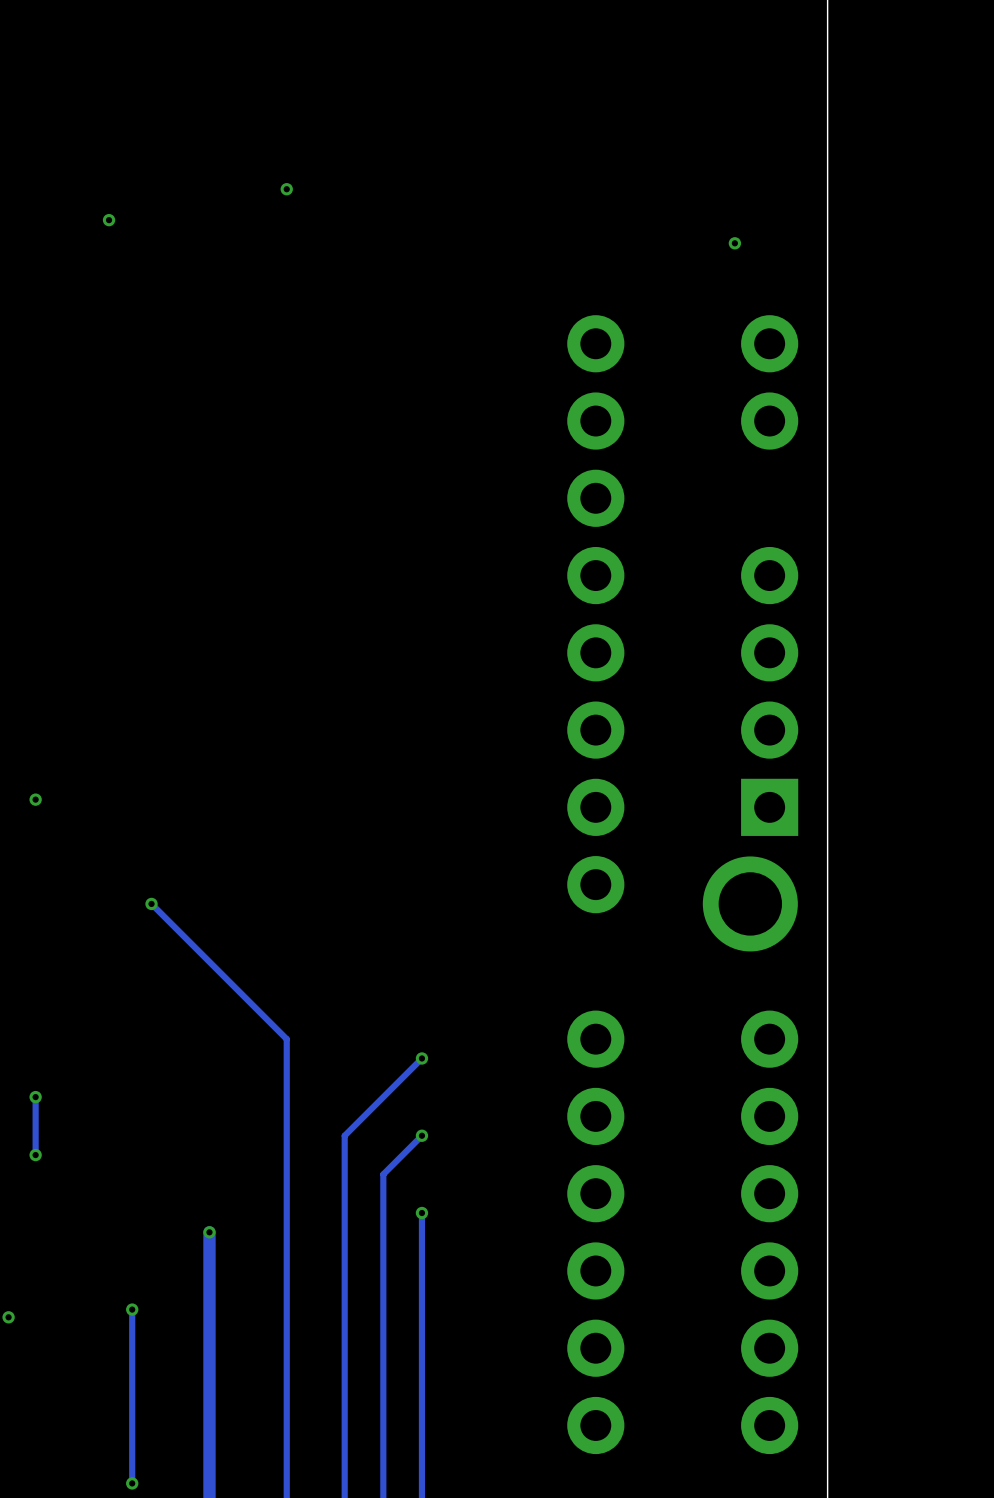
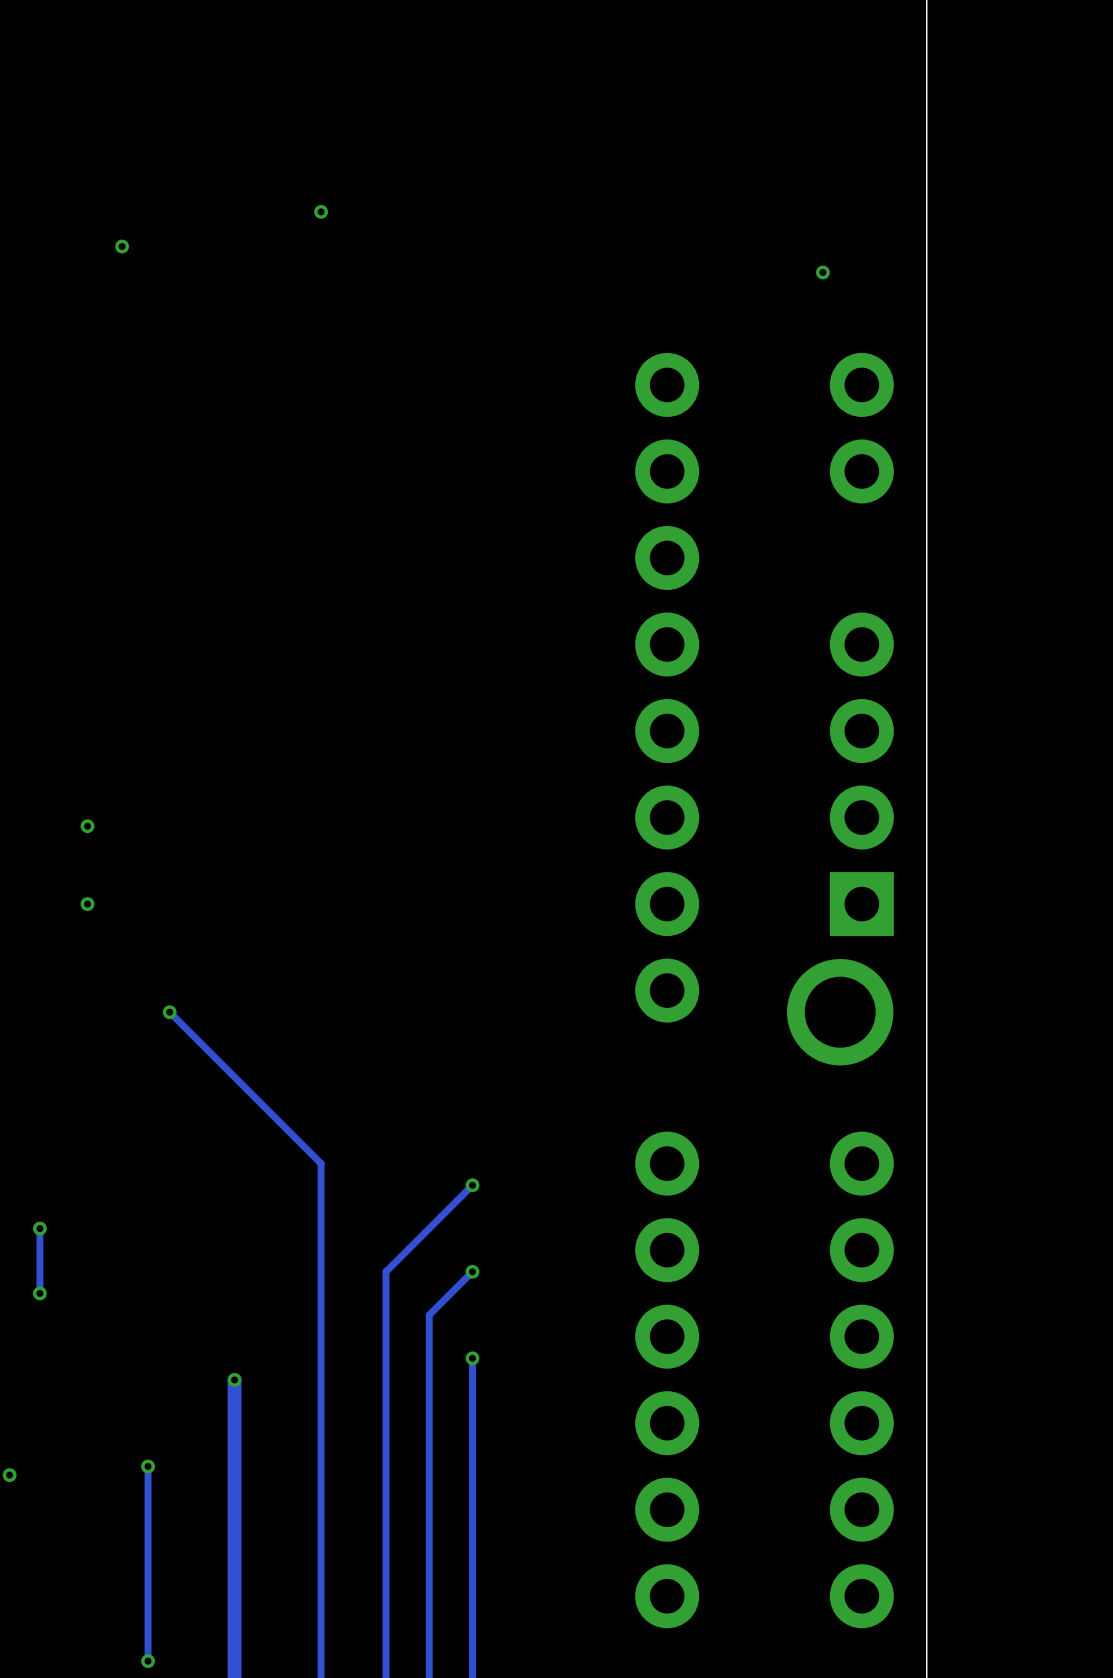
via: none -> (87, 826)
via: (35, 799) -> none
via: none -> (87, 904)

